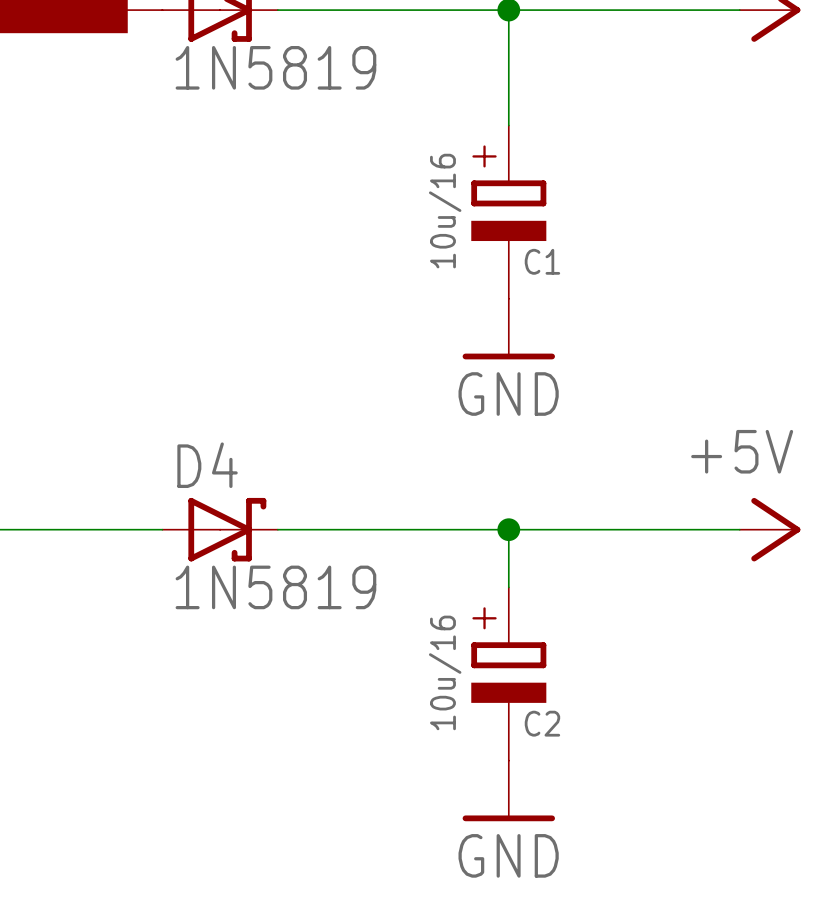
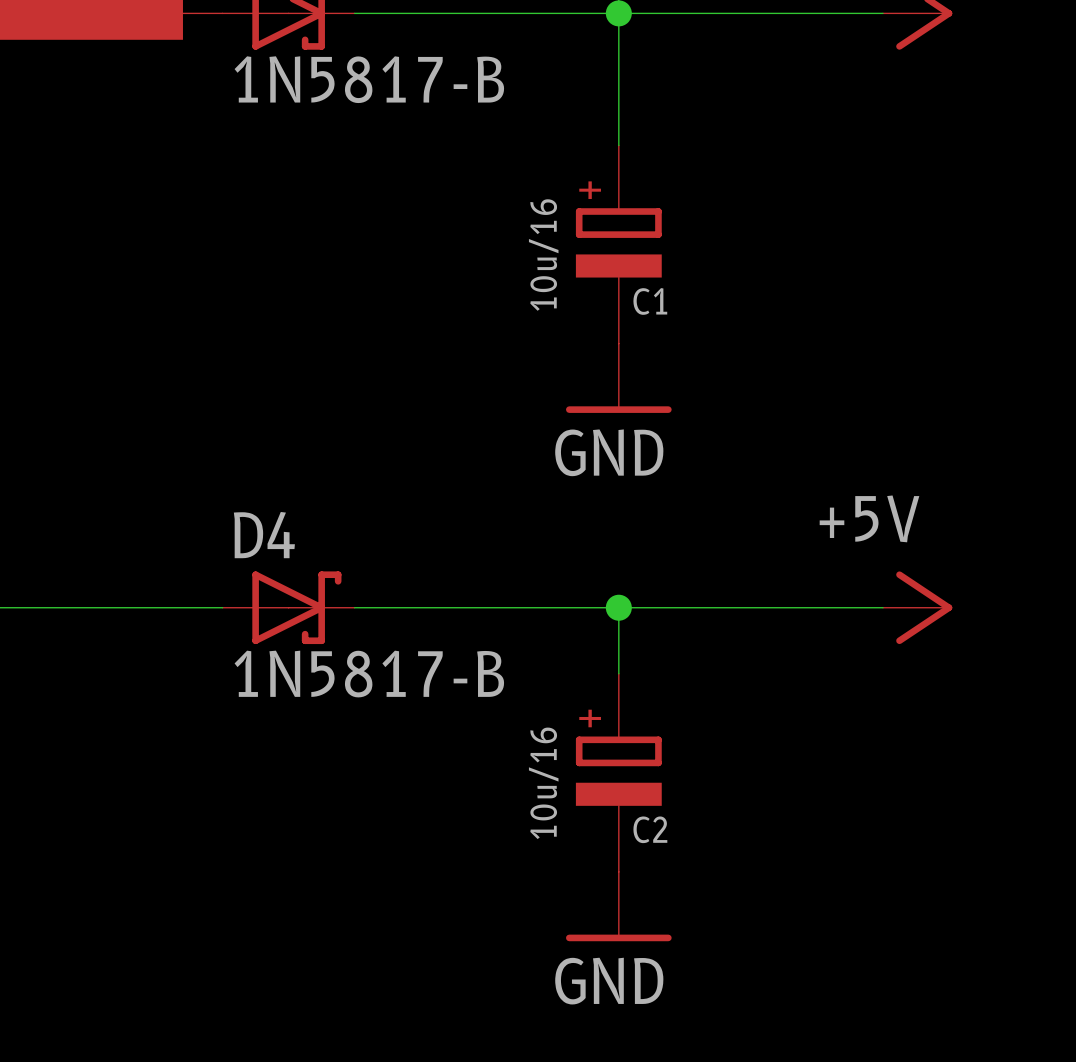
part value: 1N5819 (275, 67) -> 1N5817-B (369, 79)
D4 value: 1N5819 (275, 587) -> 1N5817-B (369, 674)

